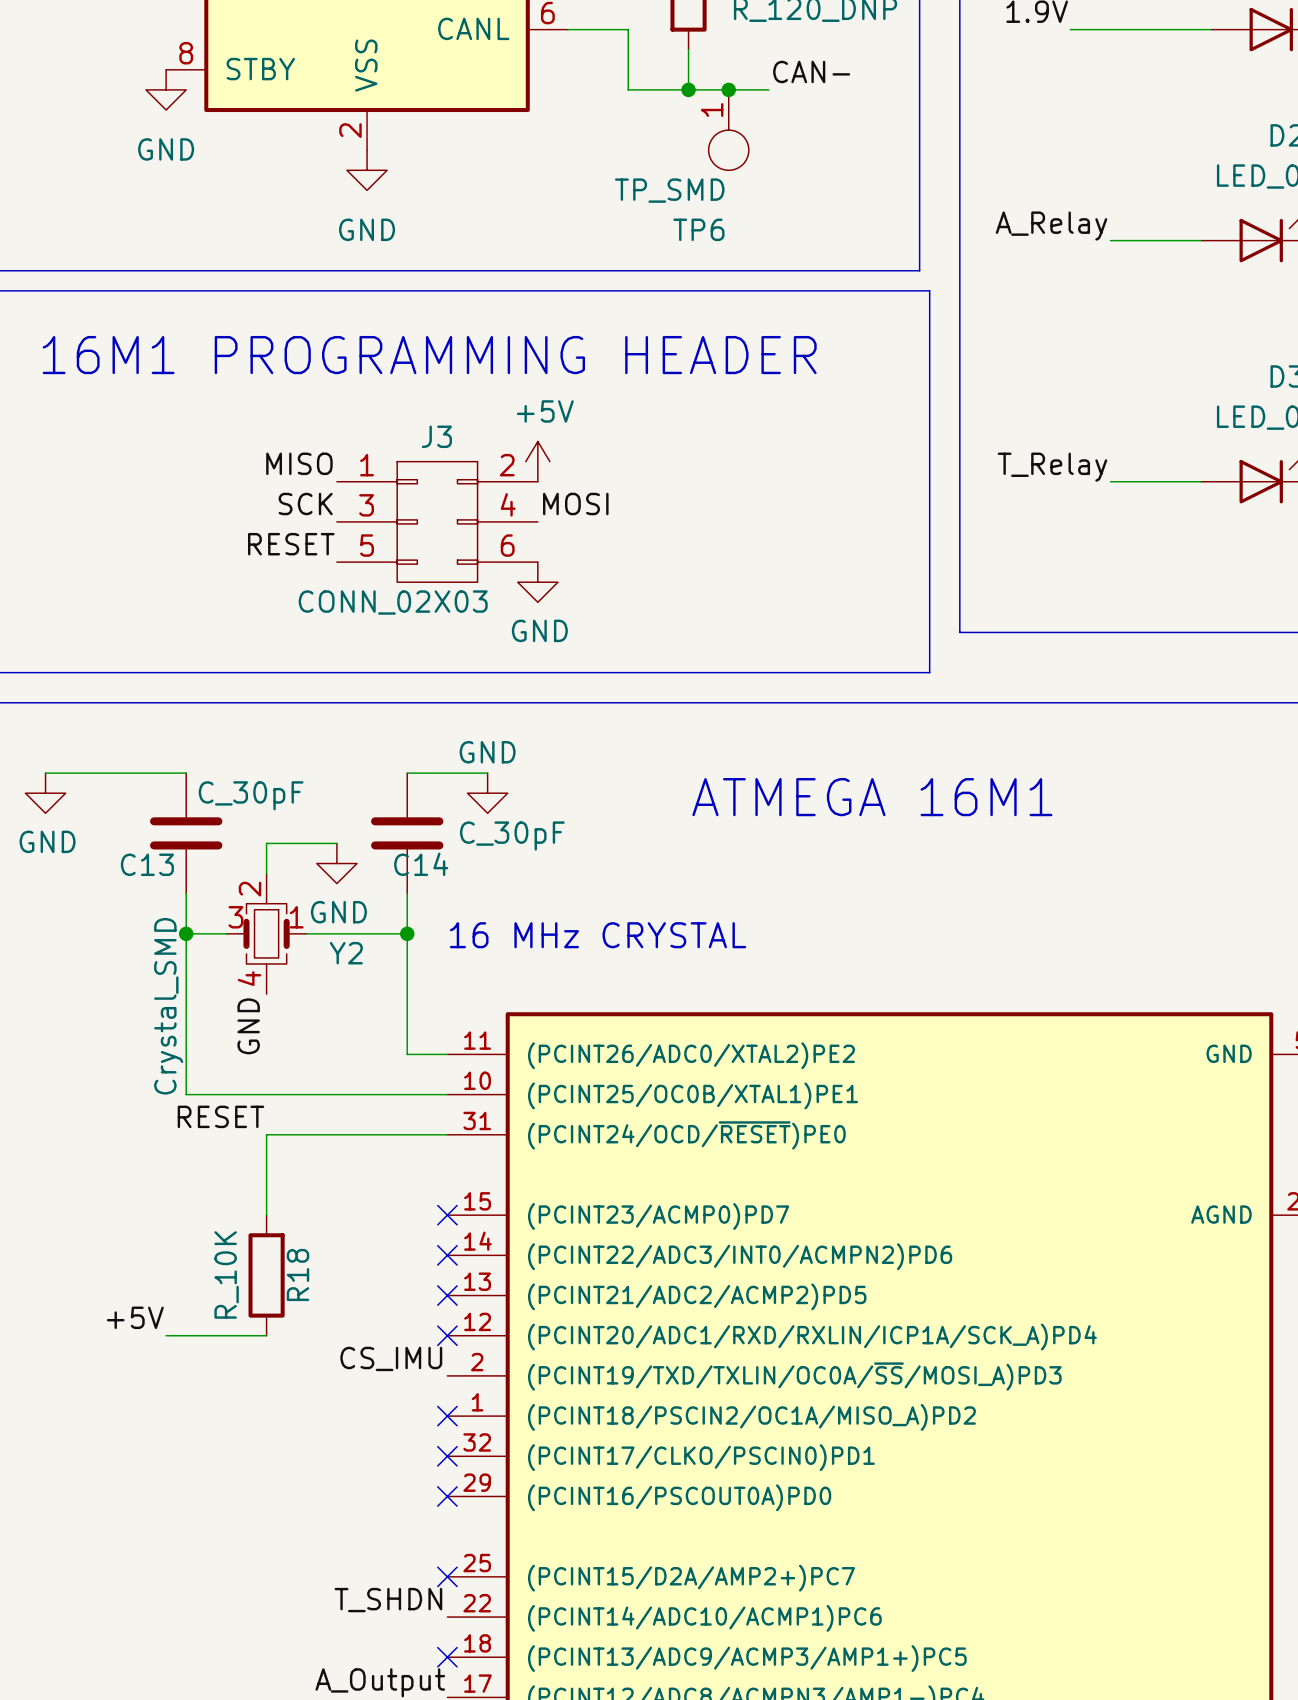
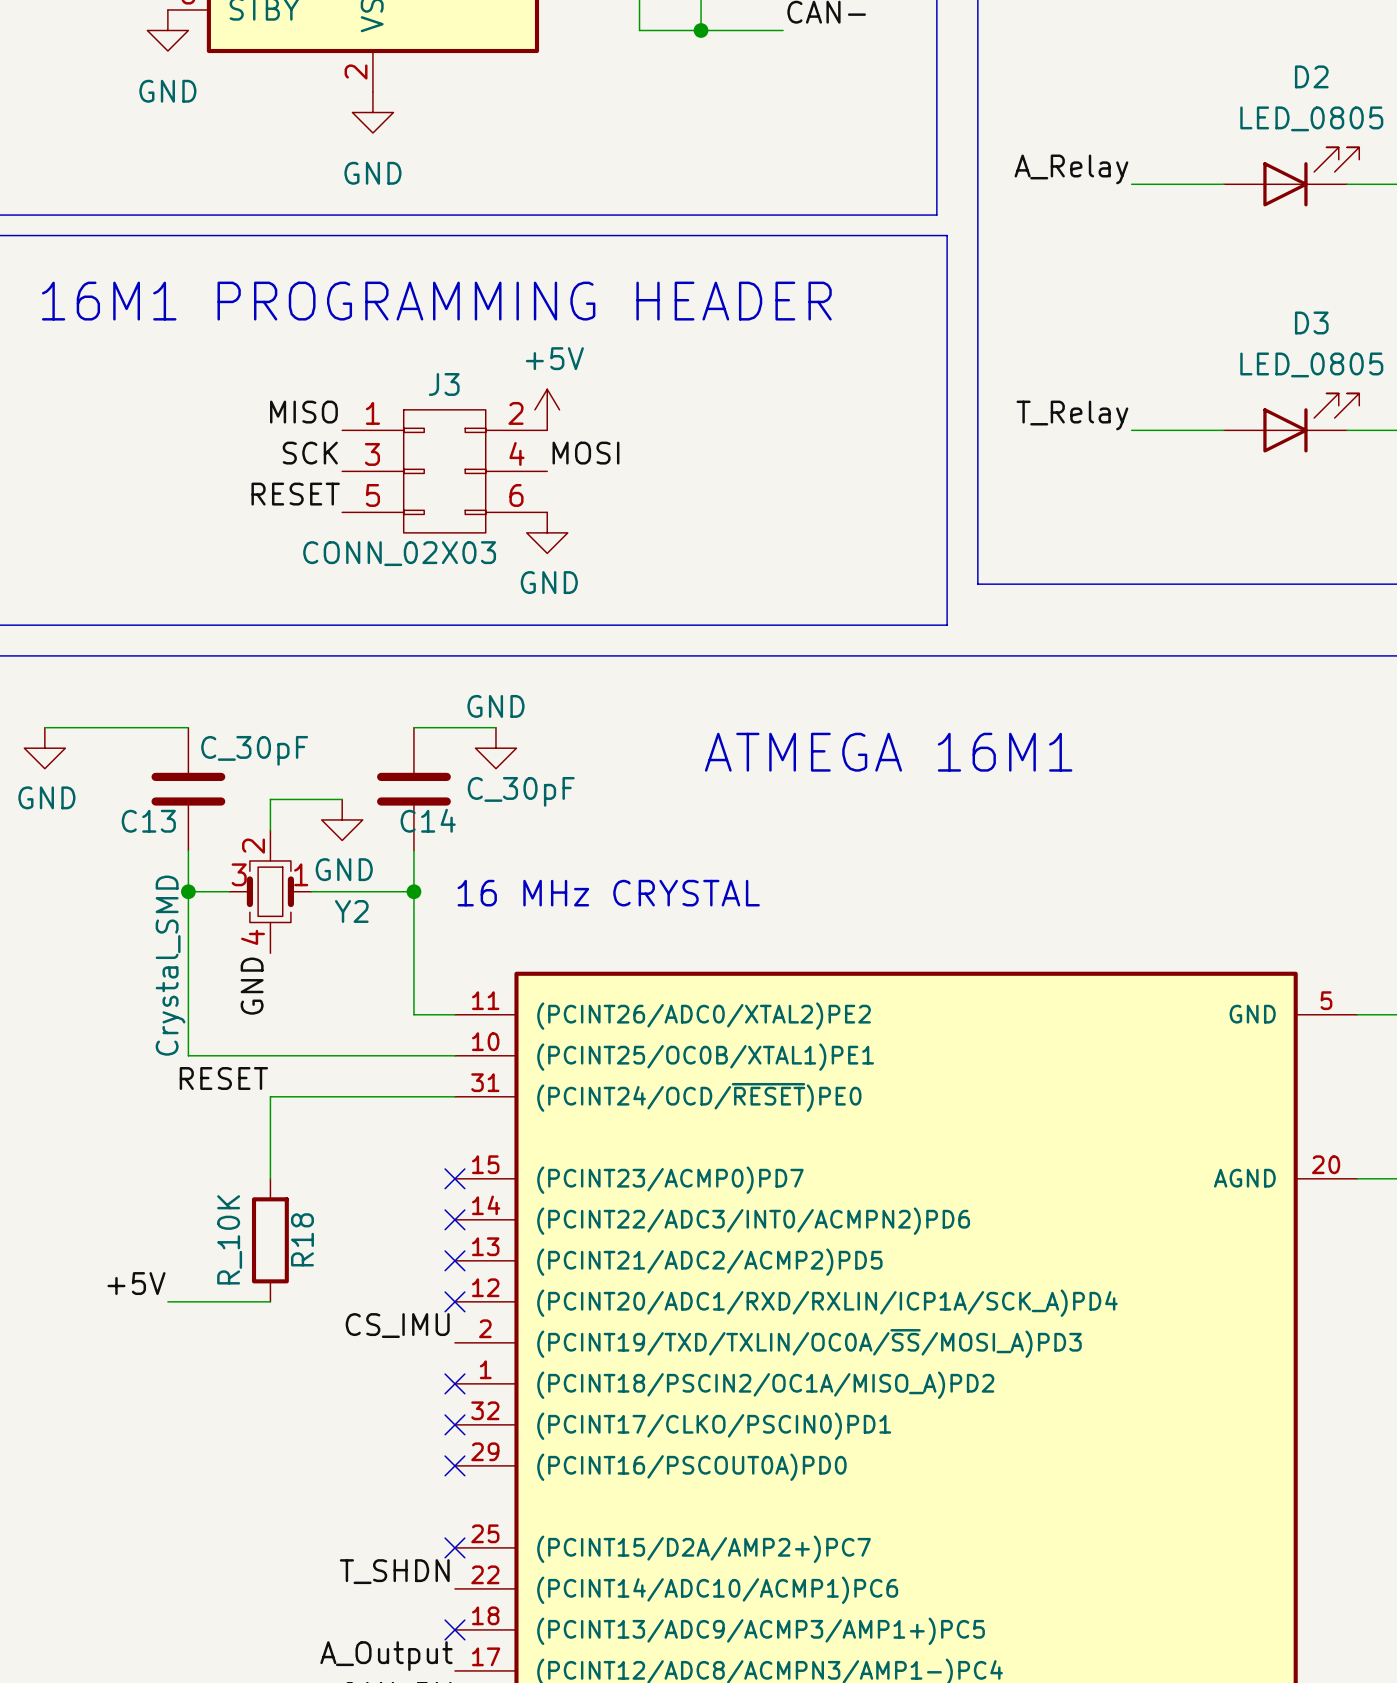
junction: (728, 89) -> none
TP6: TP_SMD (728, 130) -> none

